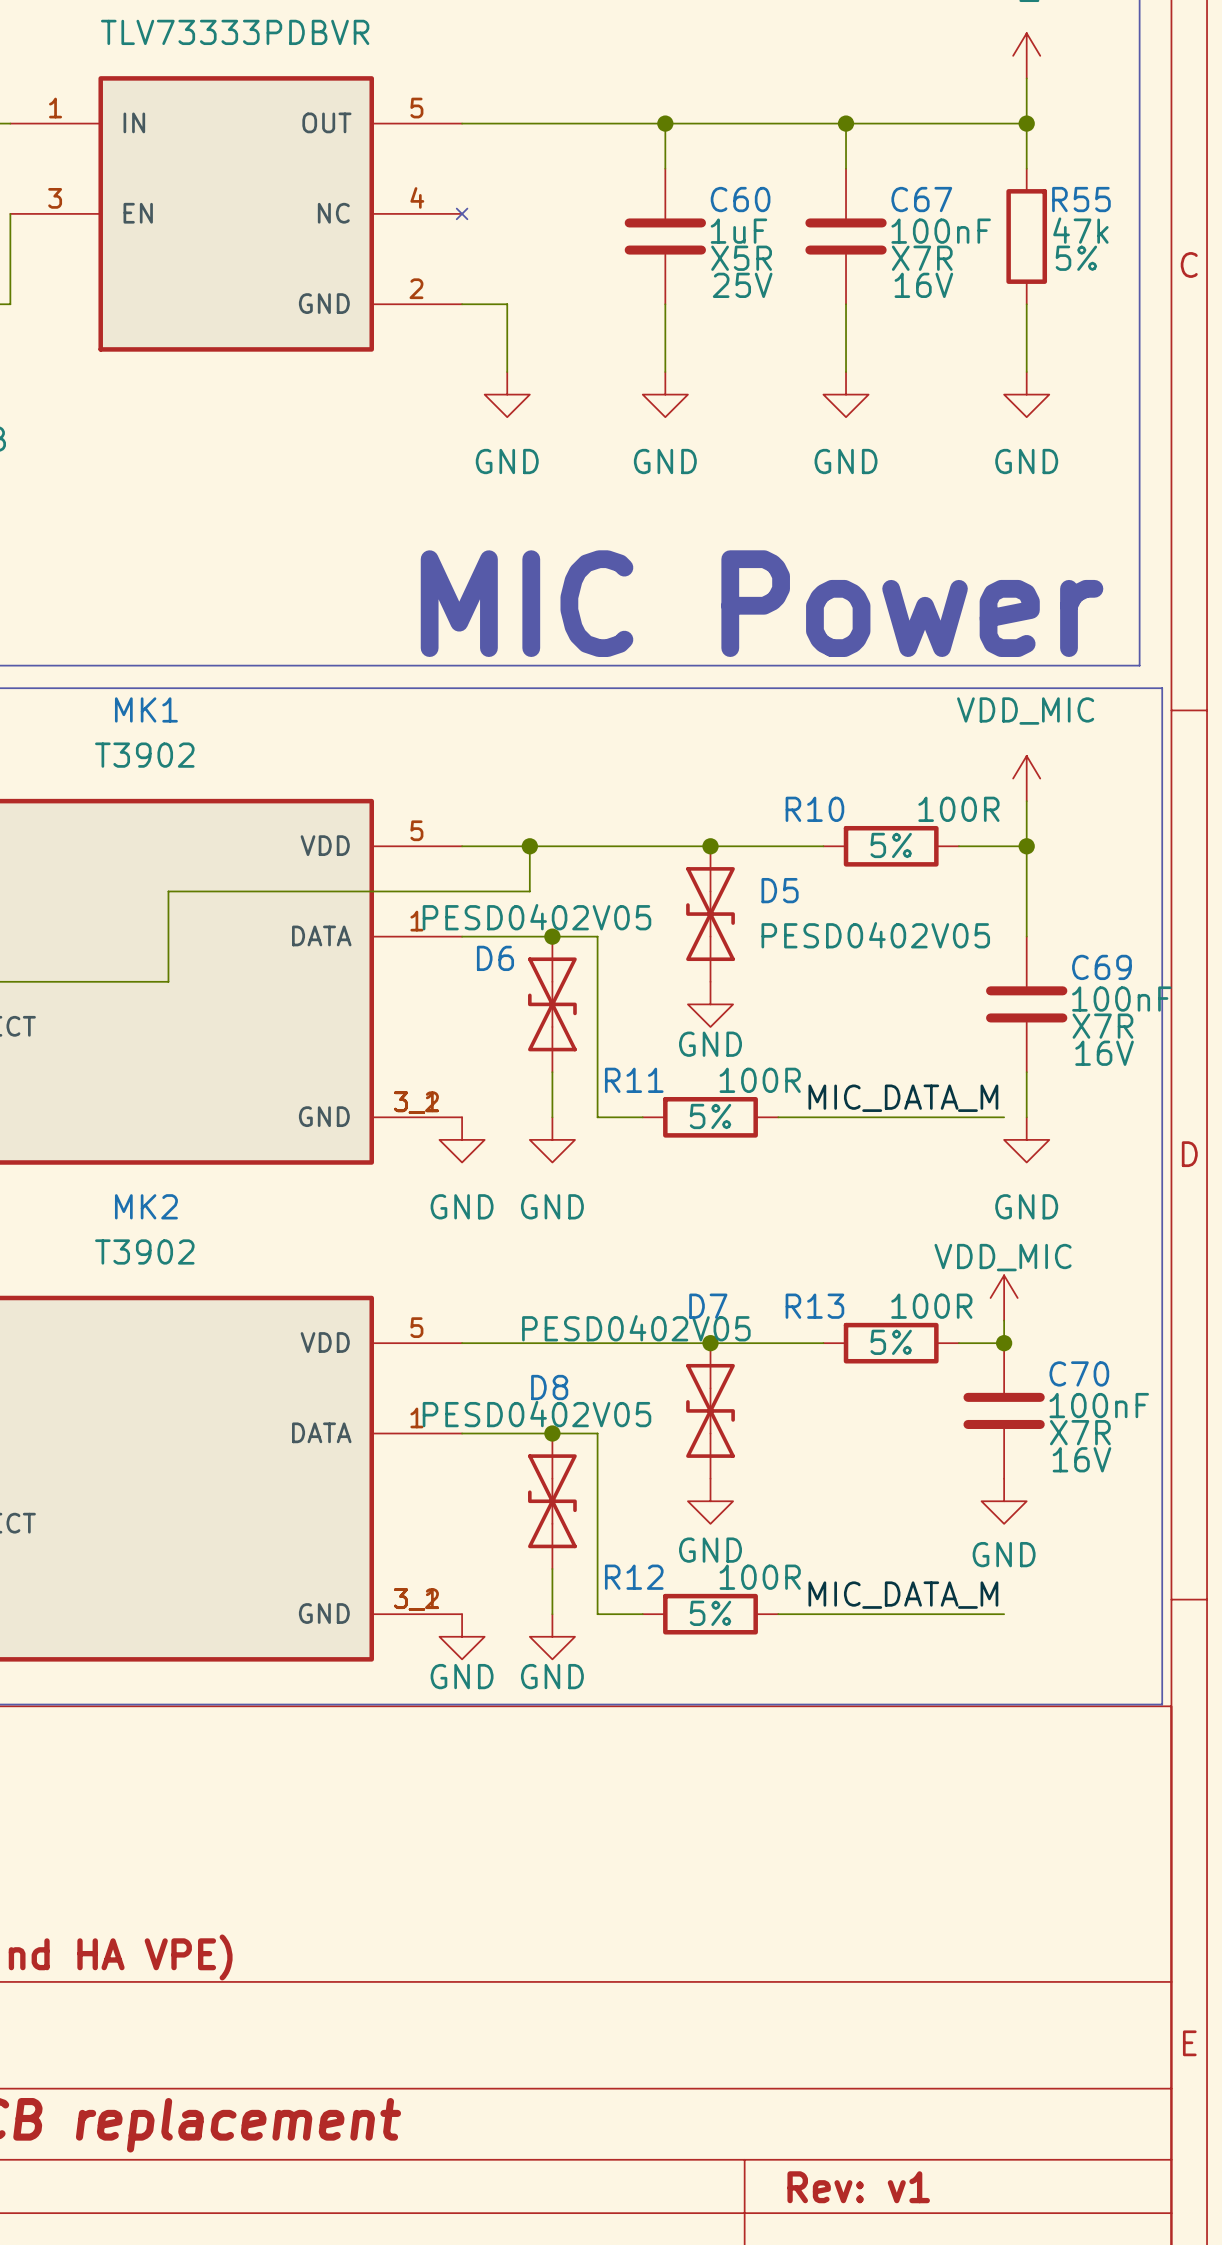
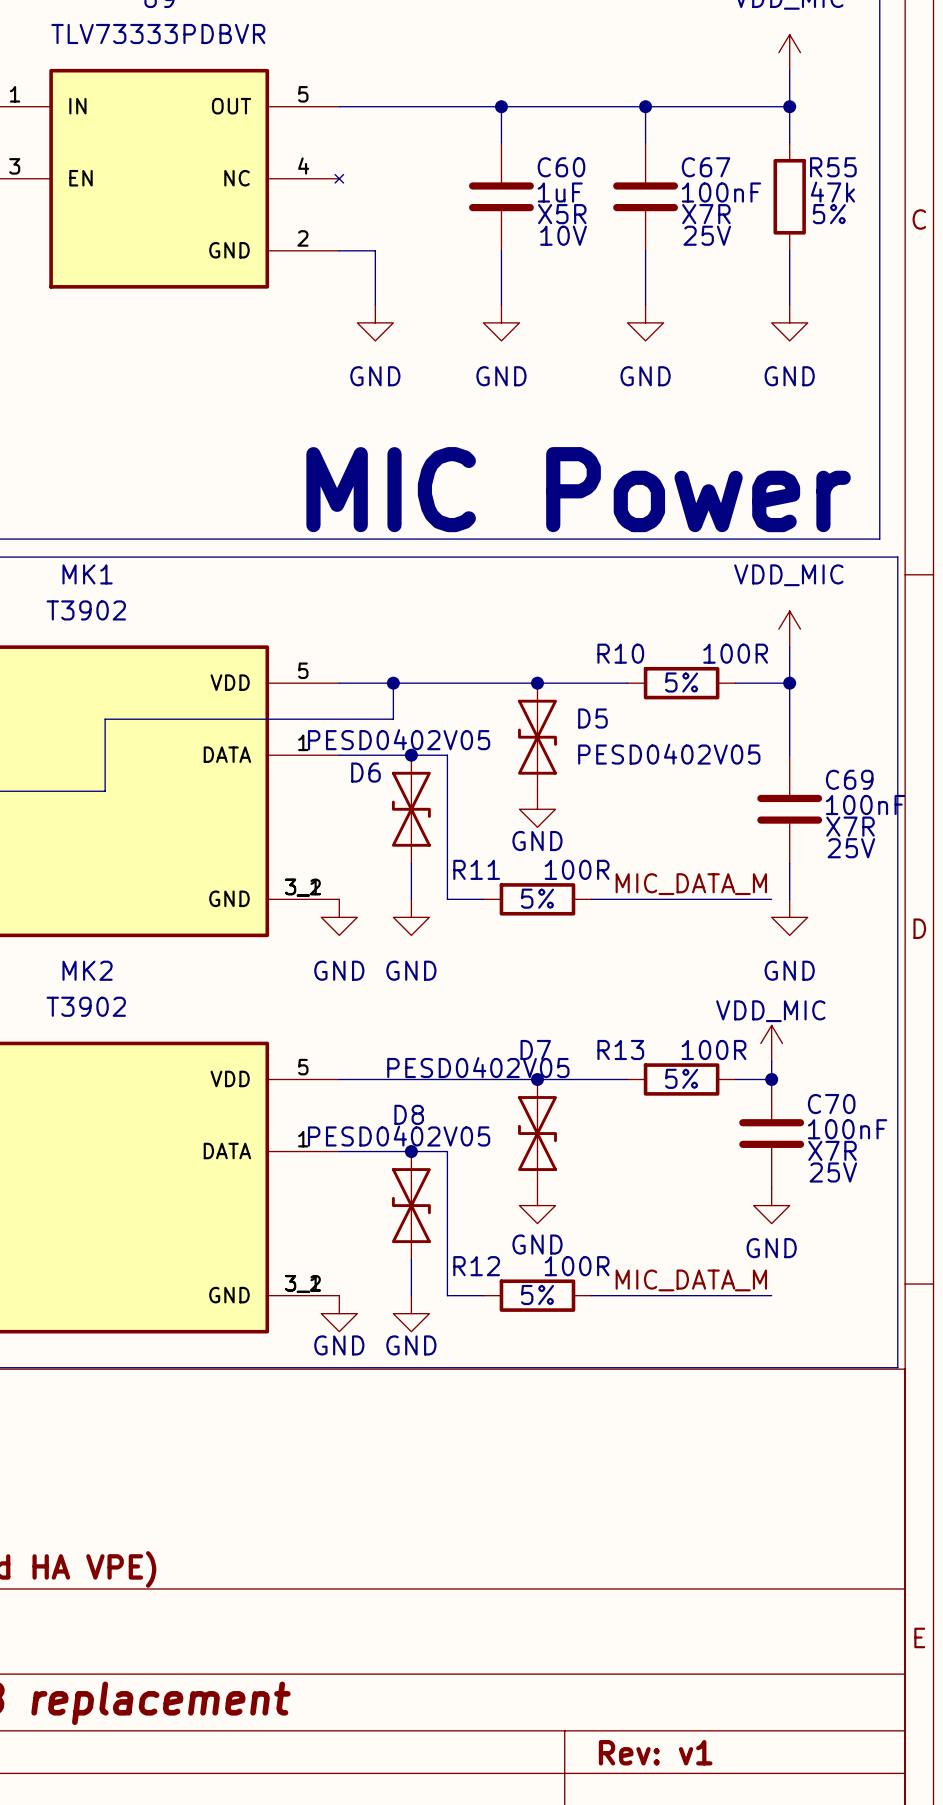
C60 text: 25V (742, 285) -> 10V (563, 235)
C67 text: 16V (923, 285) -> 25V (707, 235)
C69 text: 16V (1104, 1053) -> 25V (851, 848)
C70 text: 16V (1081, 1459) -> 25V (833, 1172)

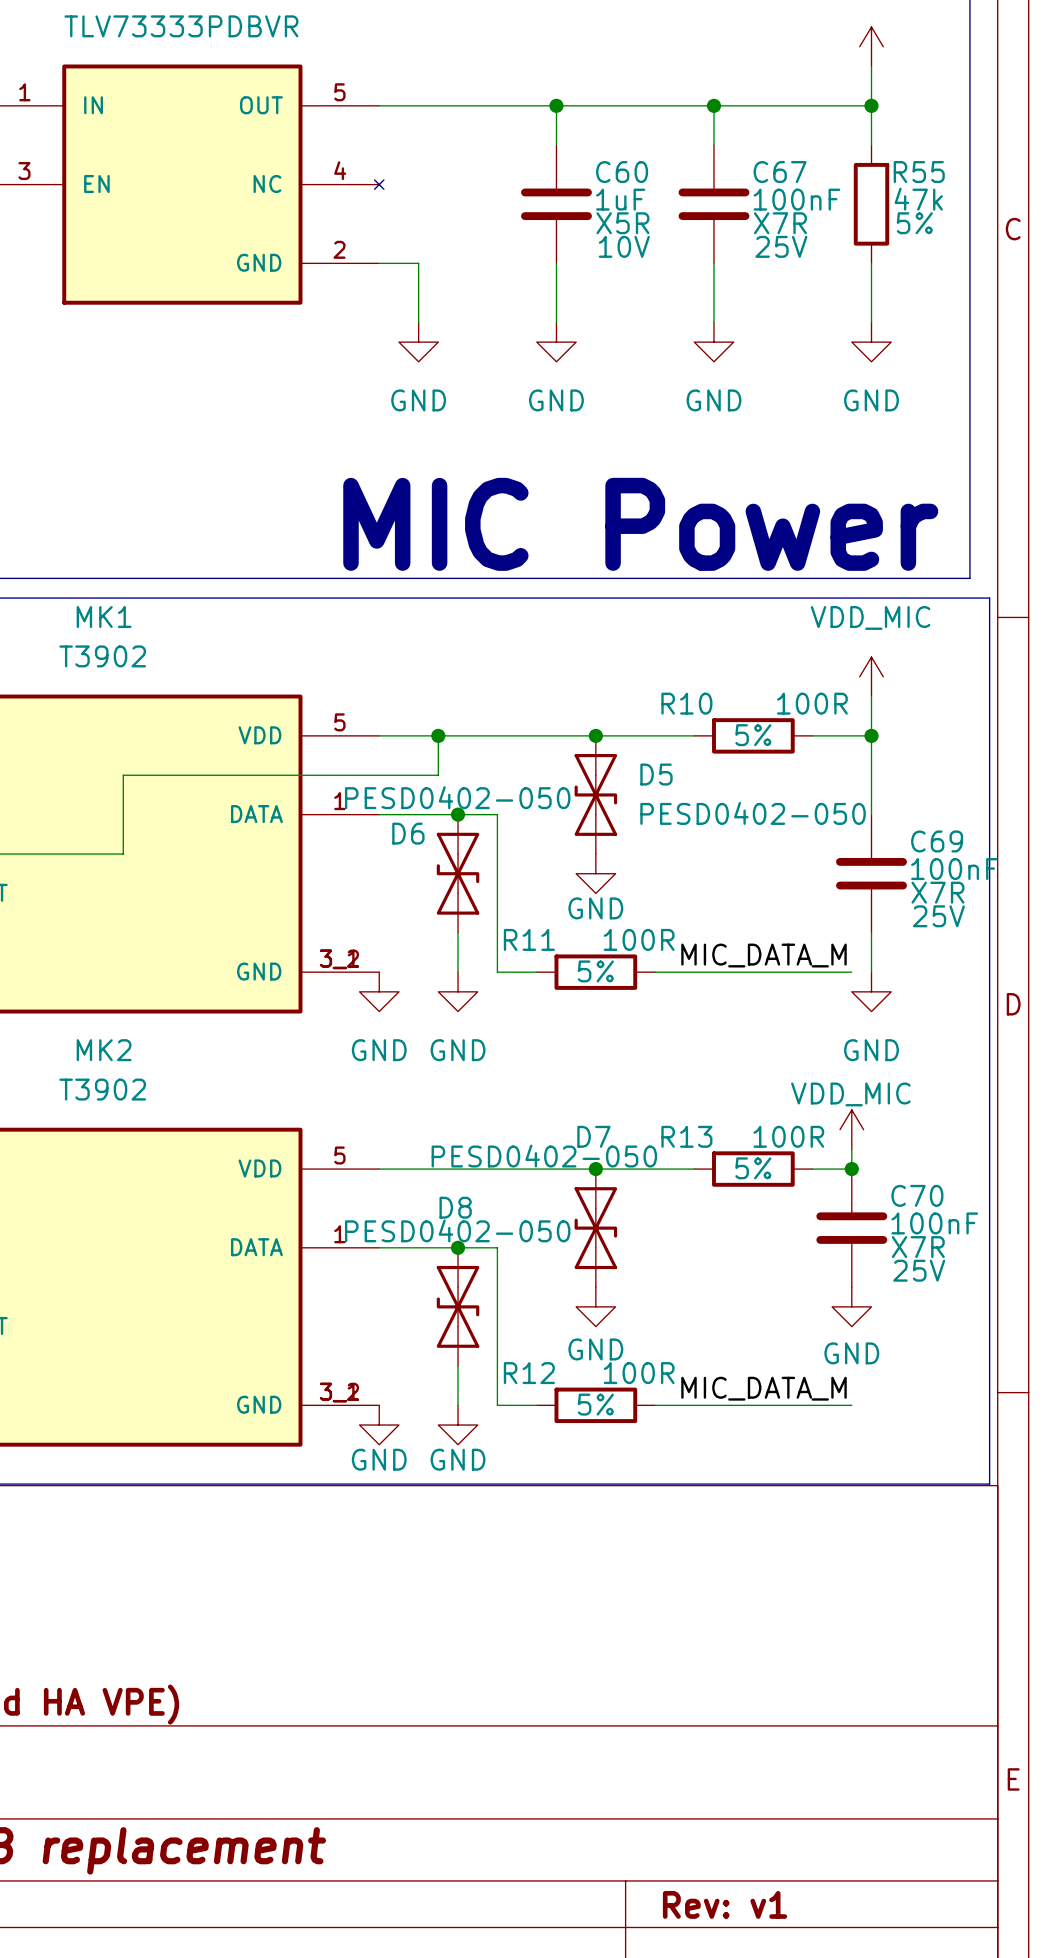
D6 value: PESD0402V05 (399, 739) -> PESD0402-050 (457, 797)
D5 value: PESD0402V05 (669, 754) -> PESD0402-050 (753, 813)
D7 value: PESD0402V05 (478, 1067) -> PESD0402-050 (544, 1156)
D8 value: PESD0402V05 (399, 1136) -> PESD0402-050 (457, 1230)

